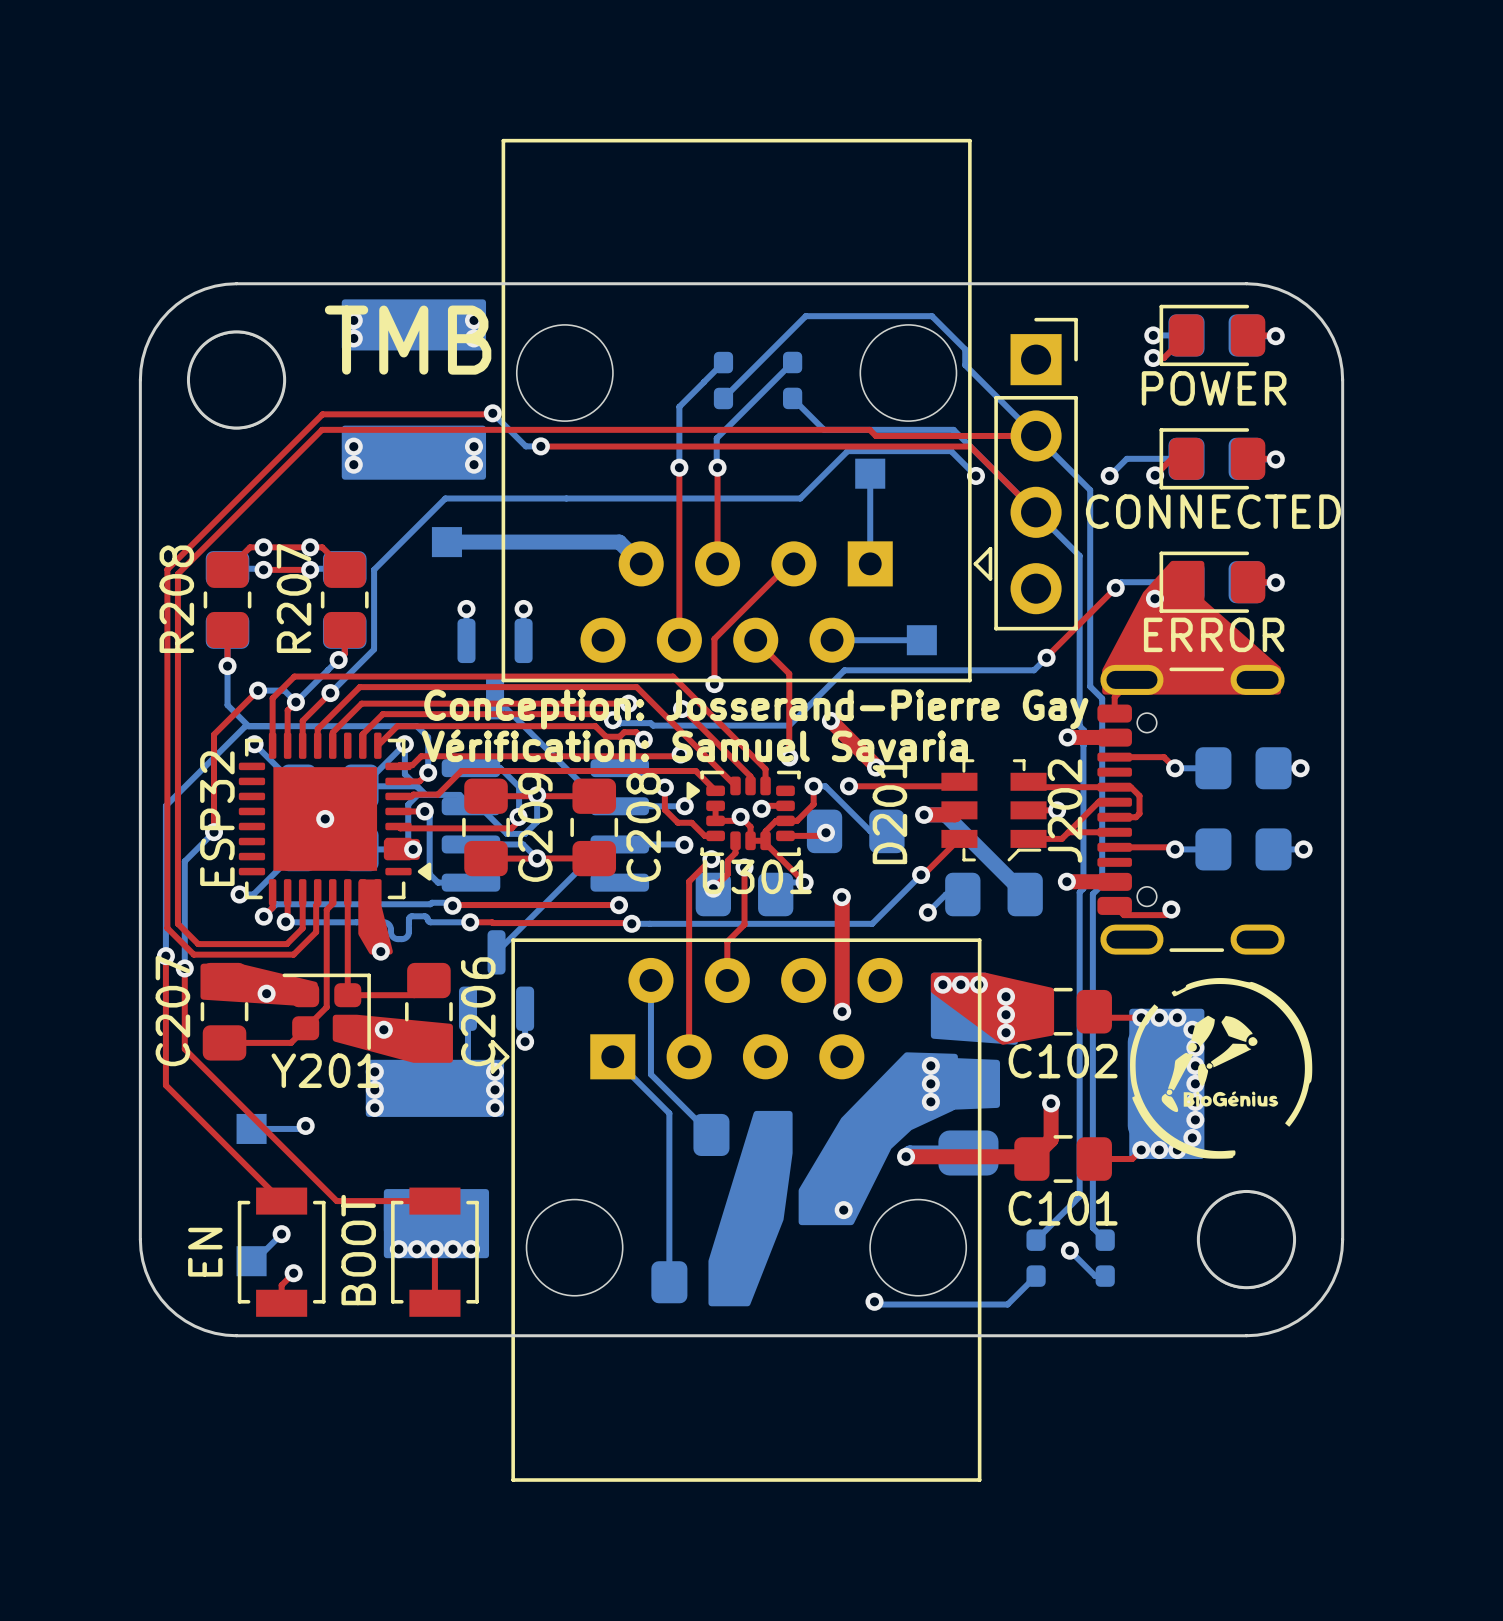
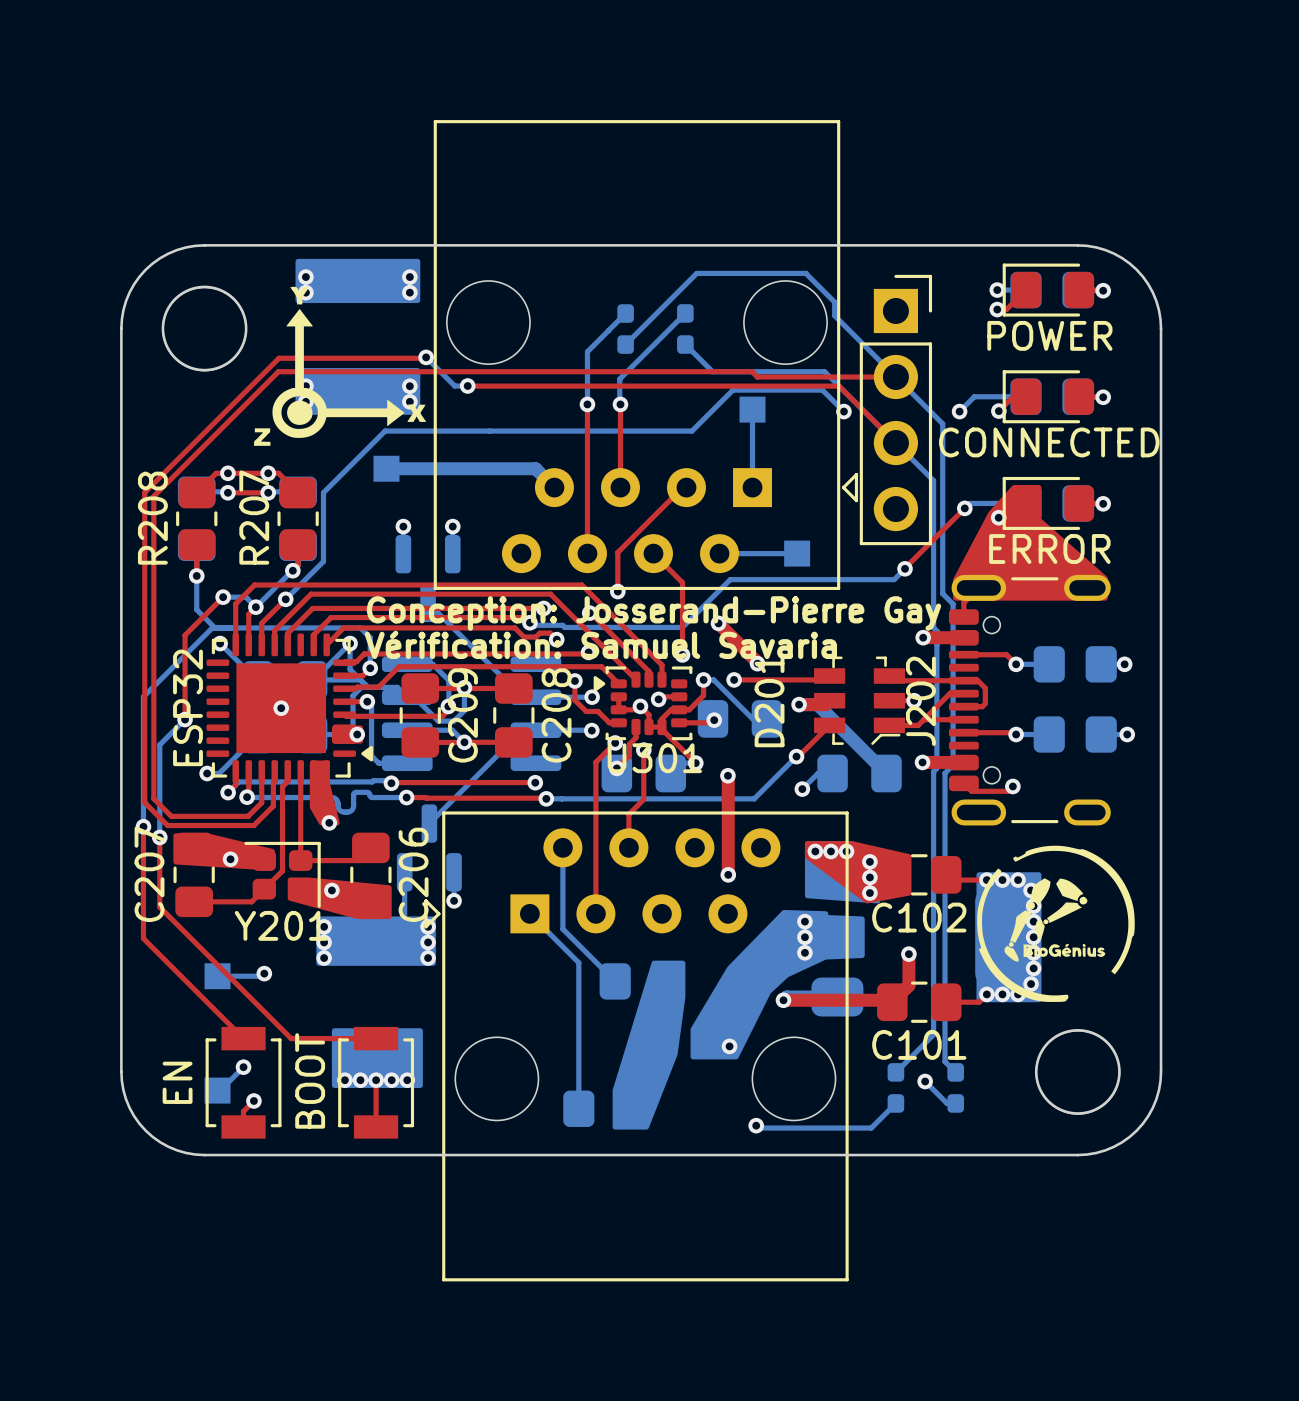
drawing: none -> [254, 286, 426, 446]
text: TMB (408, 340) -> none

